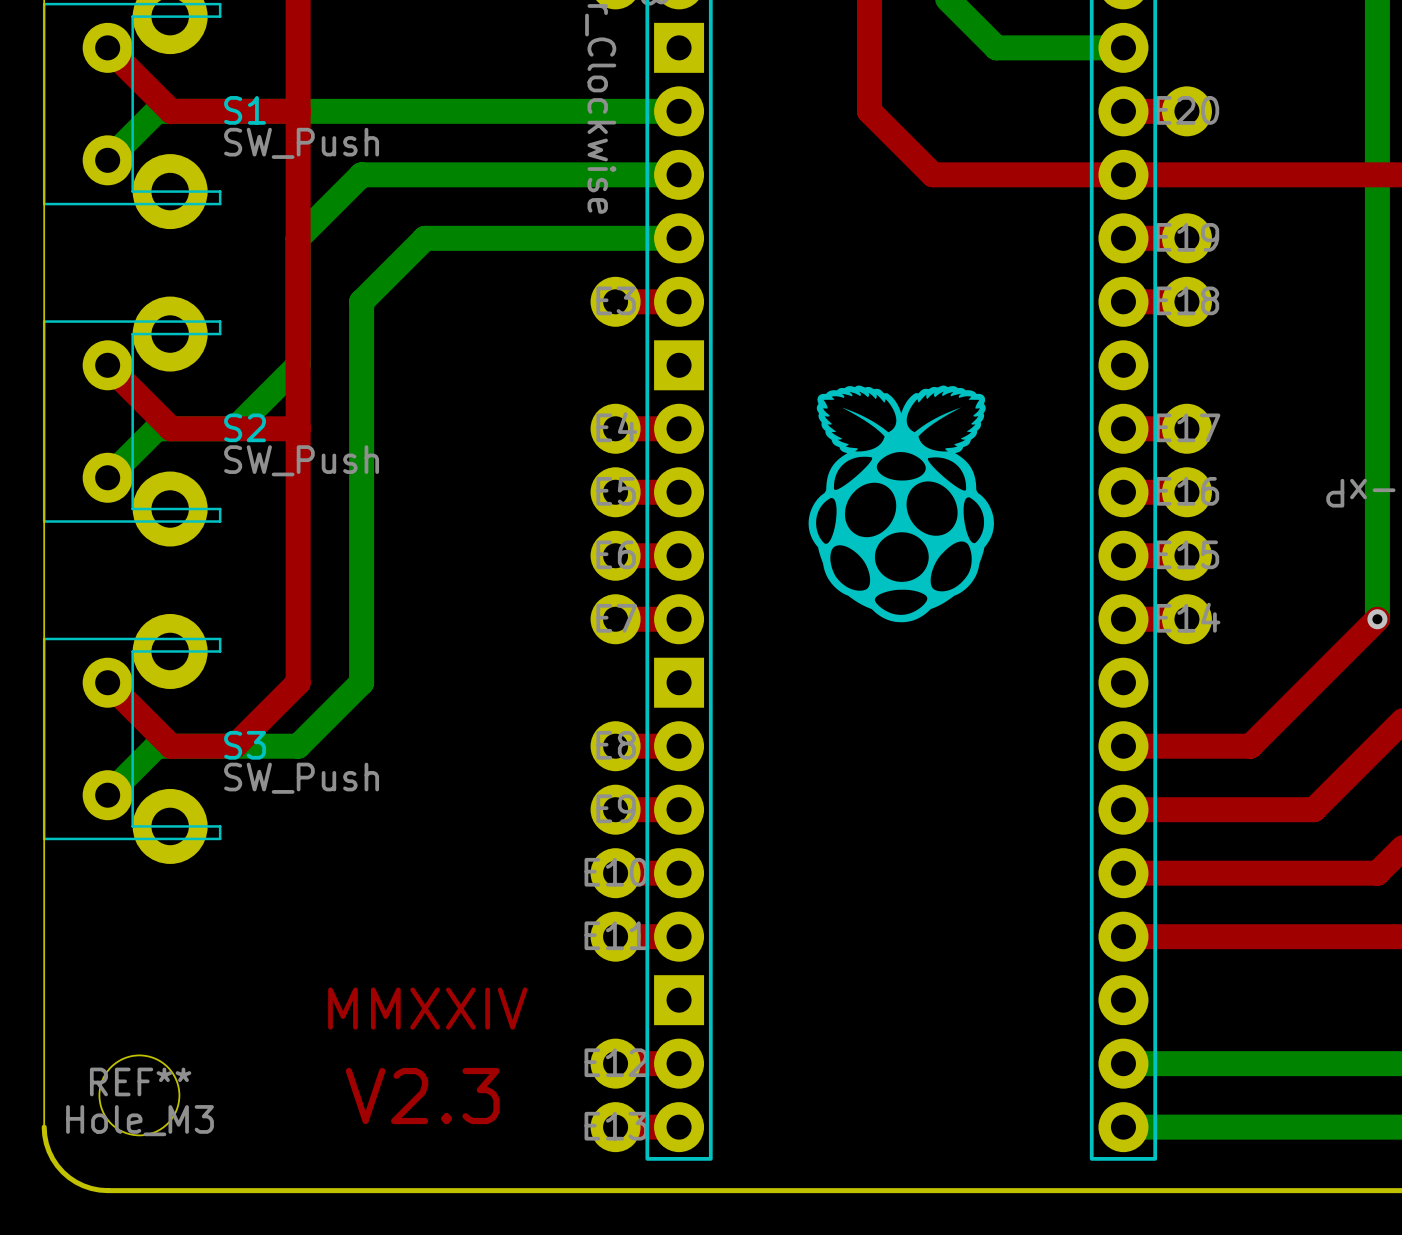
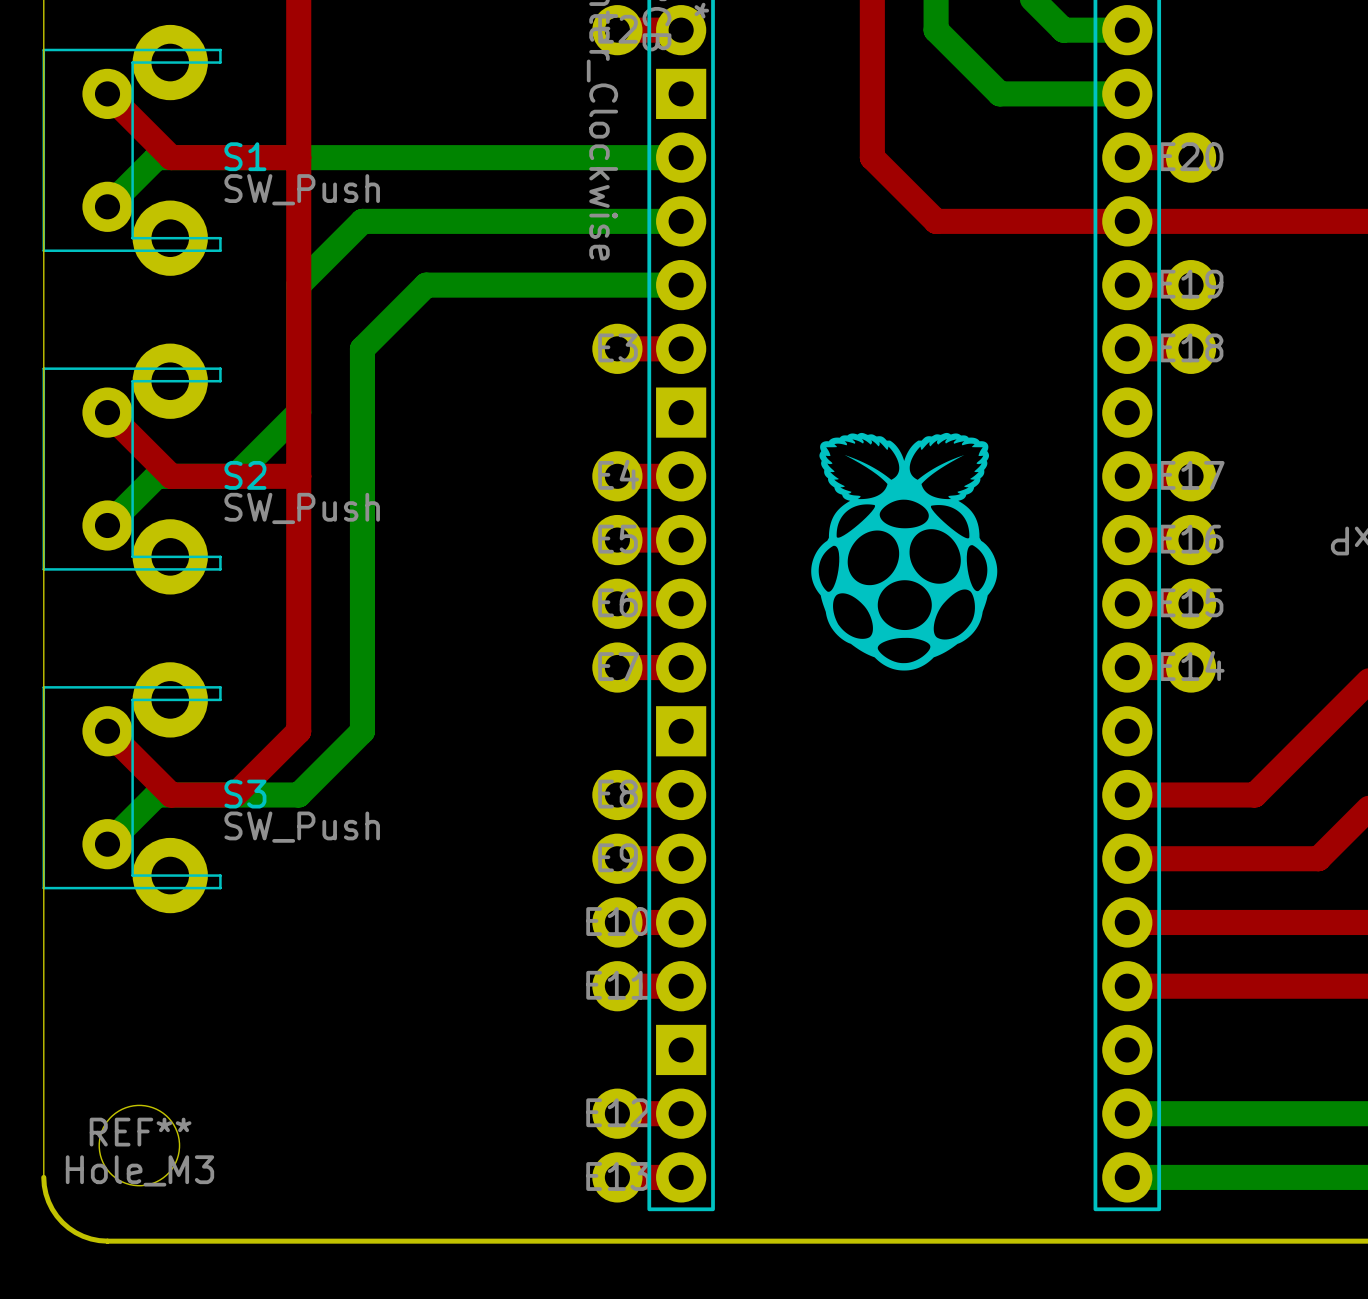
text: MMXXIV (427, 1008) -> none
text: V2.3 (422, 1096) -> none

